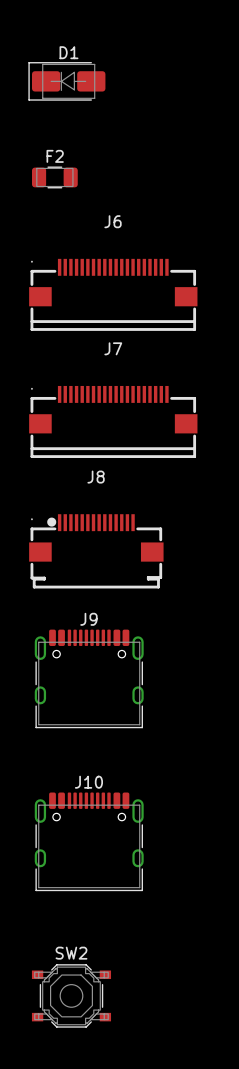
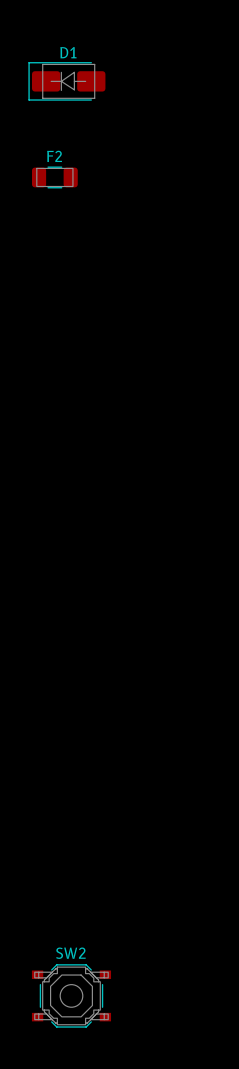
J6: (113, 294) -> none
J7: (113, 421) -> none
J8: (96, 551) -> none
J9: (89, 678) -> none
J10: (89, 841) -> none

